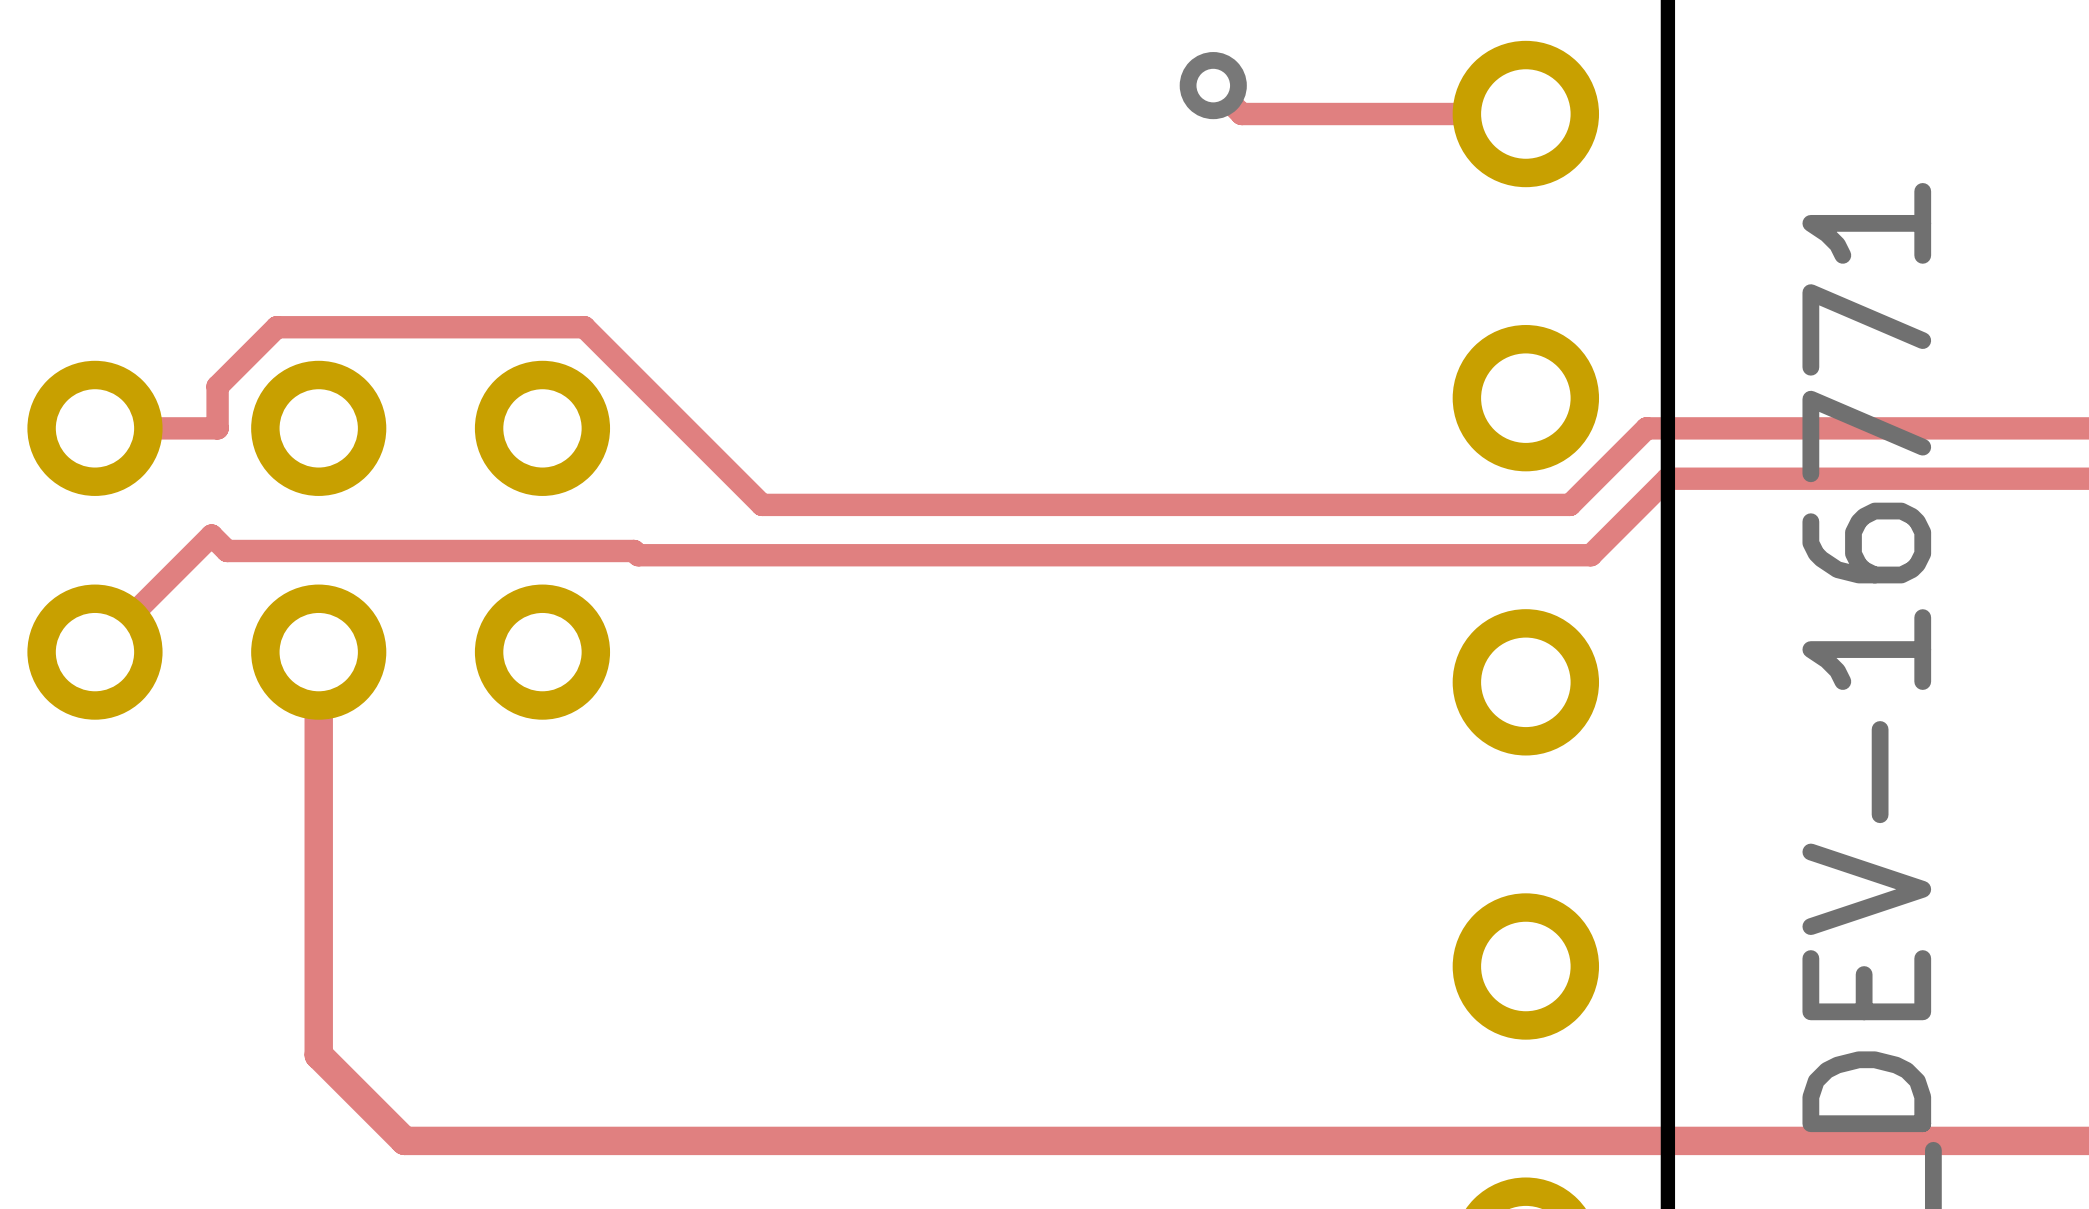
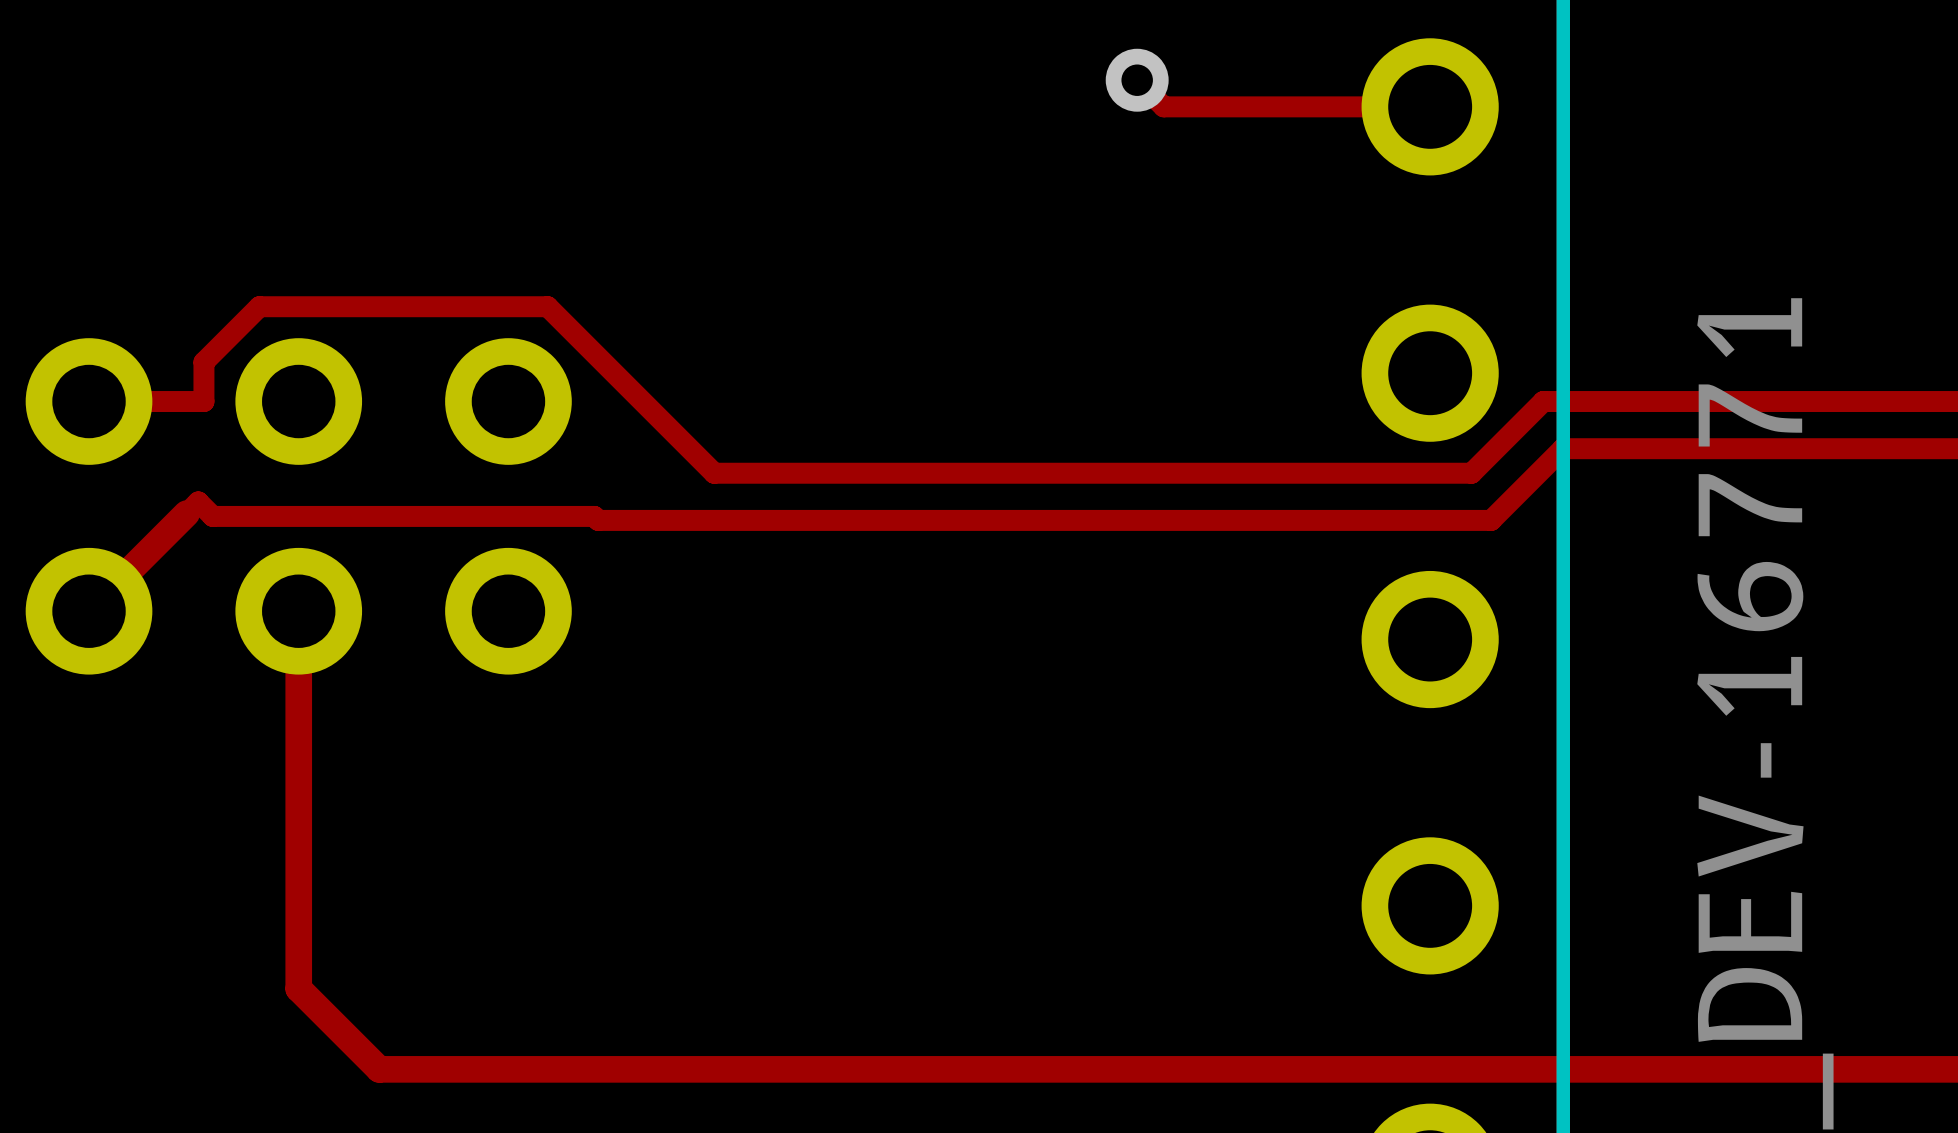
track width: thin (199, 547) (94, 652) -> thick (186, 513) (89, 611)

